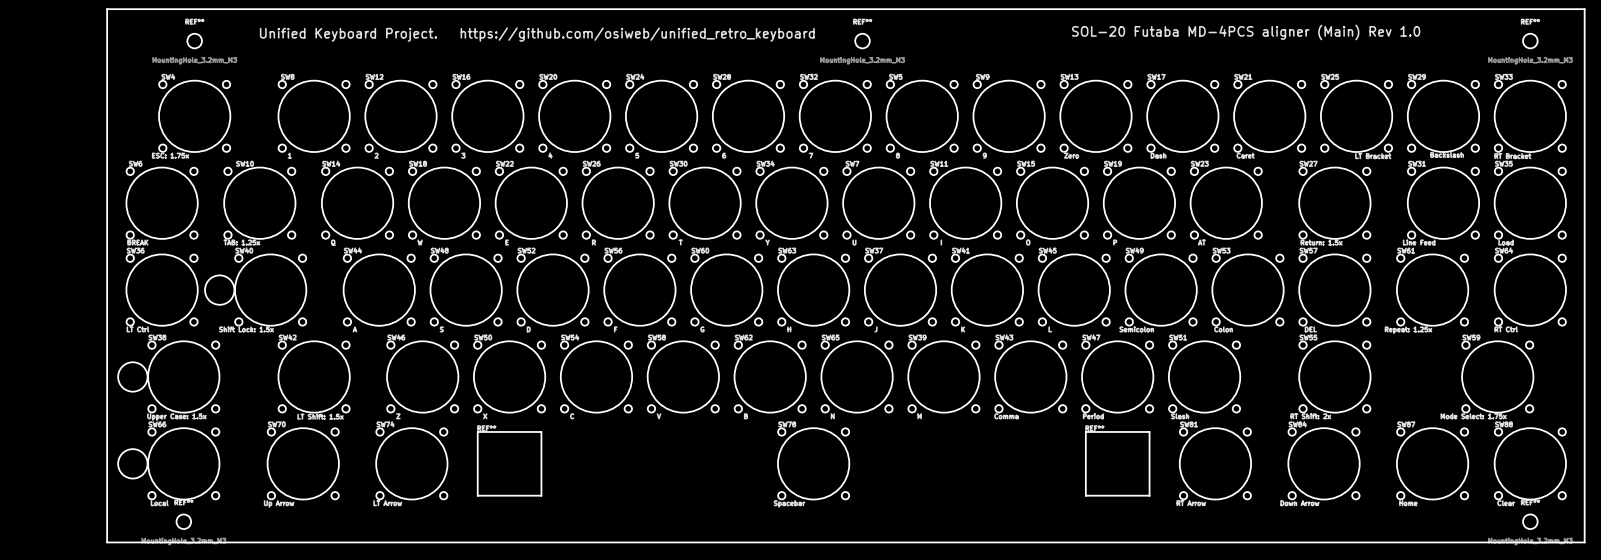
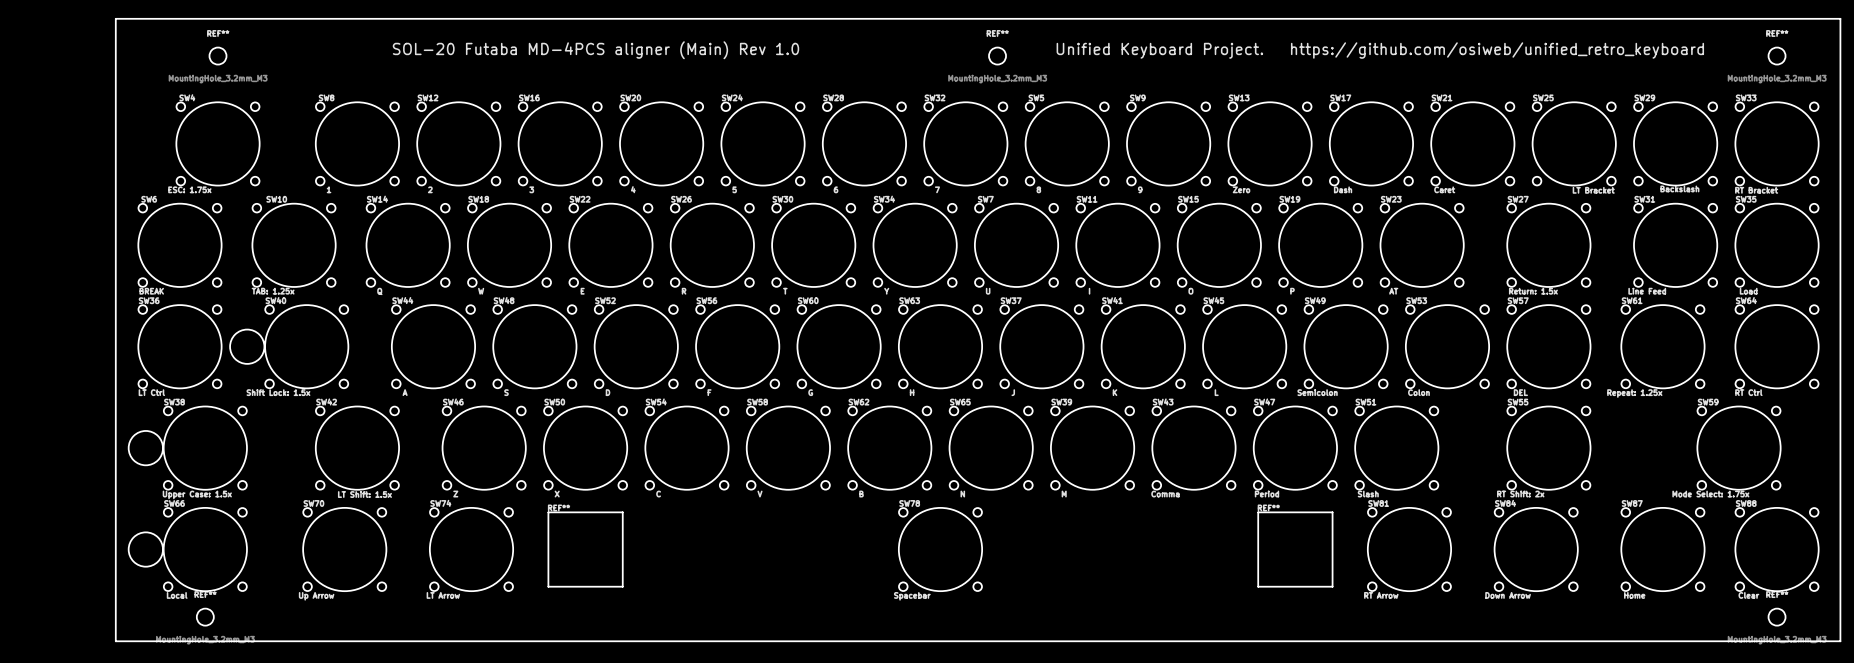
text: SOL-20 Futaba MD-4PCS aligner (Main) Rev 1.0 (1246, 32) -> none
text: Unified Keyboard Project. https://github.com/osiweb/unified_retro_keyboard (537, 34) -> none
text: none -> SOL-20 Futaba MD-4PCS aligner (Main) Rev 1.0 (595, 50)
text: none -> Unified Keyboard Project. https://github.com/osiweb/unified_retro_keyboard (1380, 50)

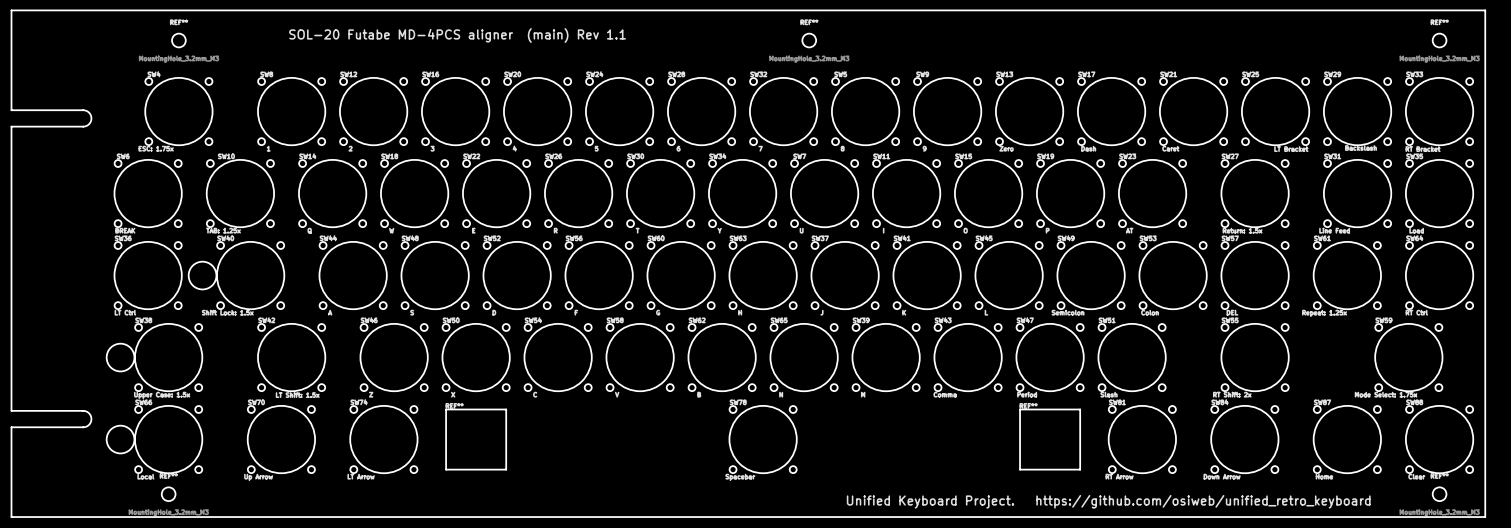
board edge: (115, 18) (115, 641) (1840, 641) (1840, 18) (1833, 18) -> (96, 10) (11, 10) (11, 110) (84, 110) (89, 113) (91, 118) (89, 123) (84, 126) (11, 126) (11, 410) (84, 410) (89, 414) (91, 419) (89, 424) (84, 427) (11, 427) (11, 517) (1485, 517) (1485, 10)
text: SOL-20 Futaba MD-4PCS aligner (Main) Rev 1.0 (595, 50) -> SOL-20 Futabe MD-4PCS aligner (main) Rev 1.1 (457, 35)
text: Unified Keyboard Project. https://github.com/osiweb/unified_retro_keyboard (1380, 50) -> none
text: none -> Unified Keyboard Project. https://github.com/osiweb/unified_retro_keyboard (1108, 501)

